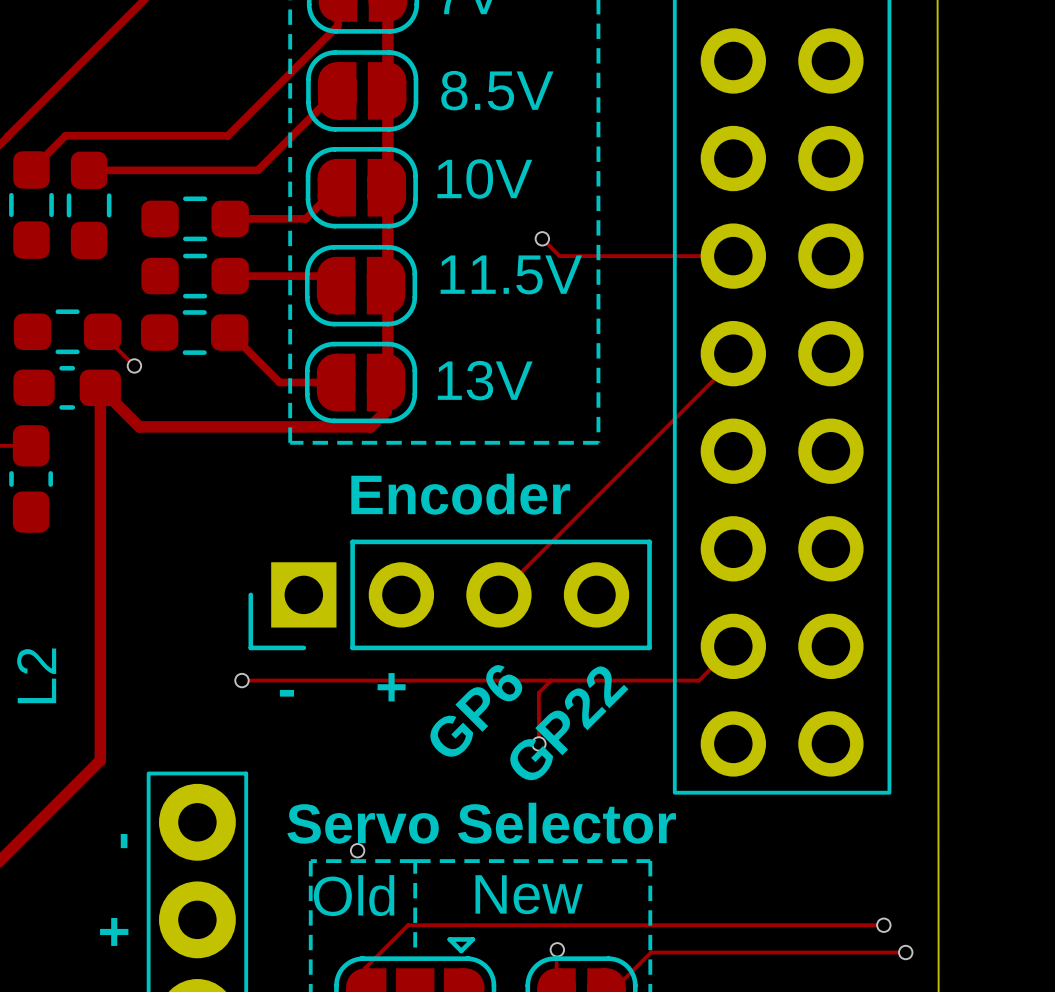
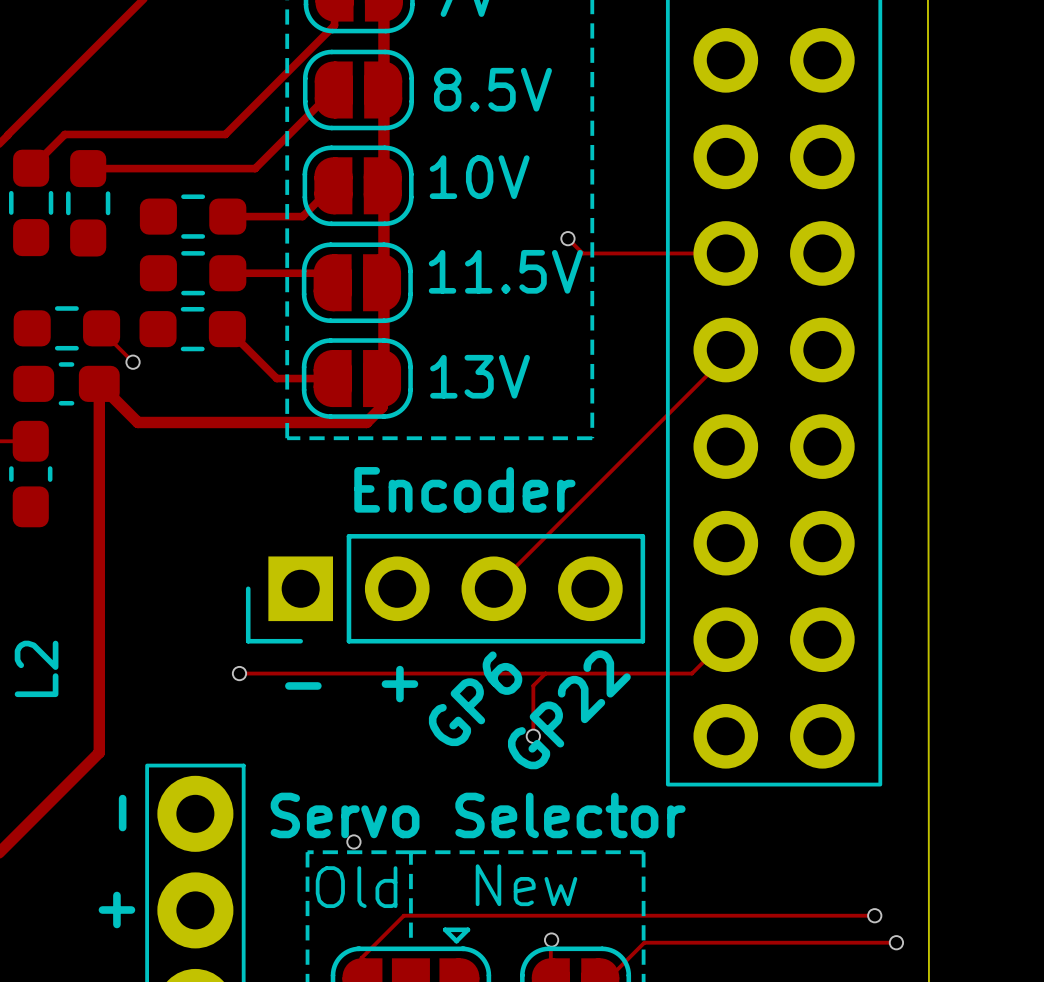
track: (542, 238) (559, 256) (588, 256) -> (567, 238) (582, 253)
via position: (542, 238) -> (567, 238)

